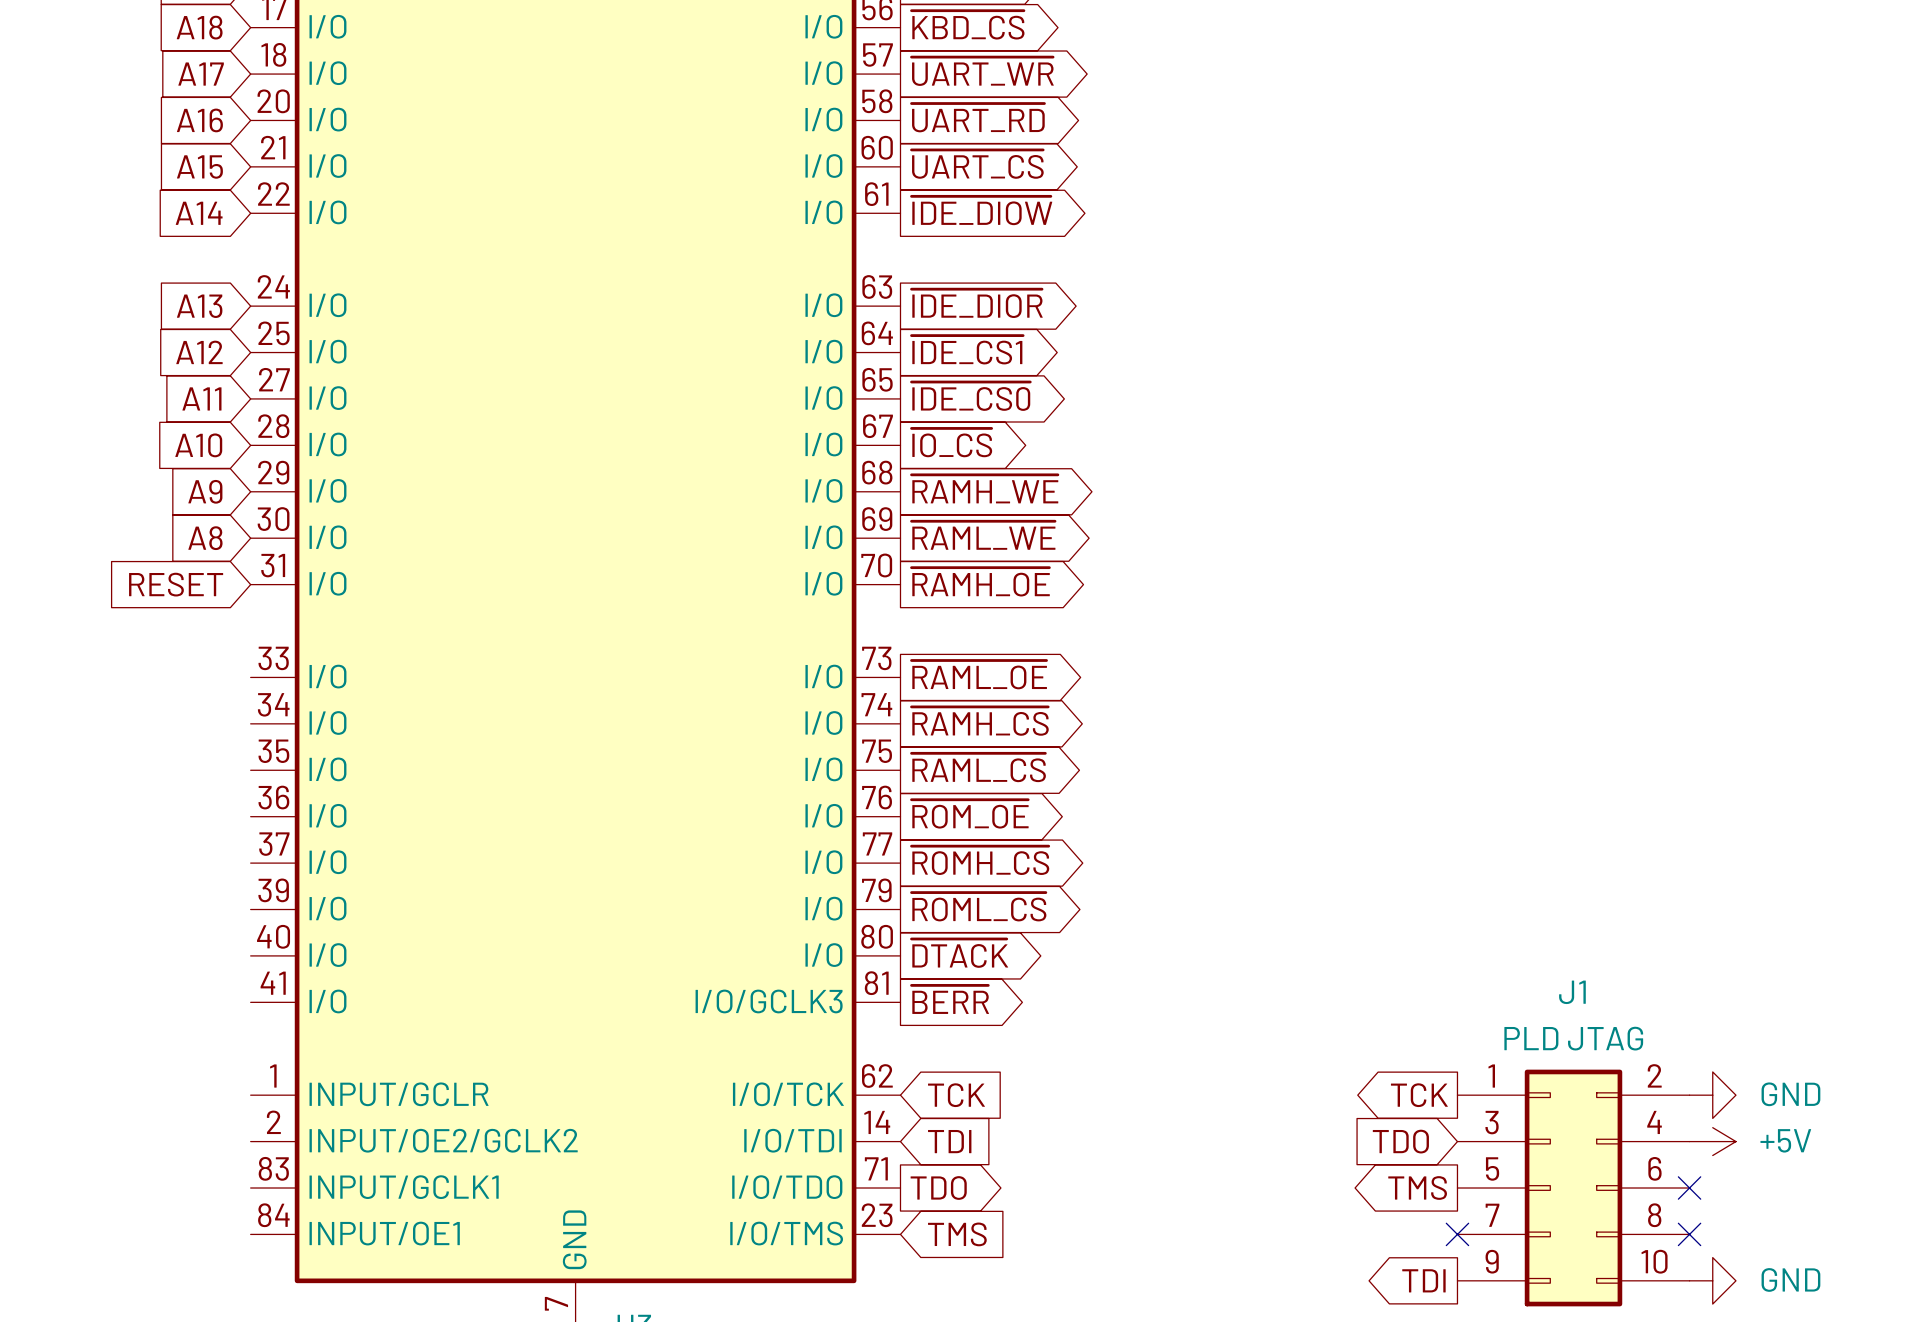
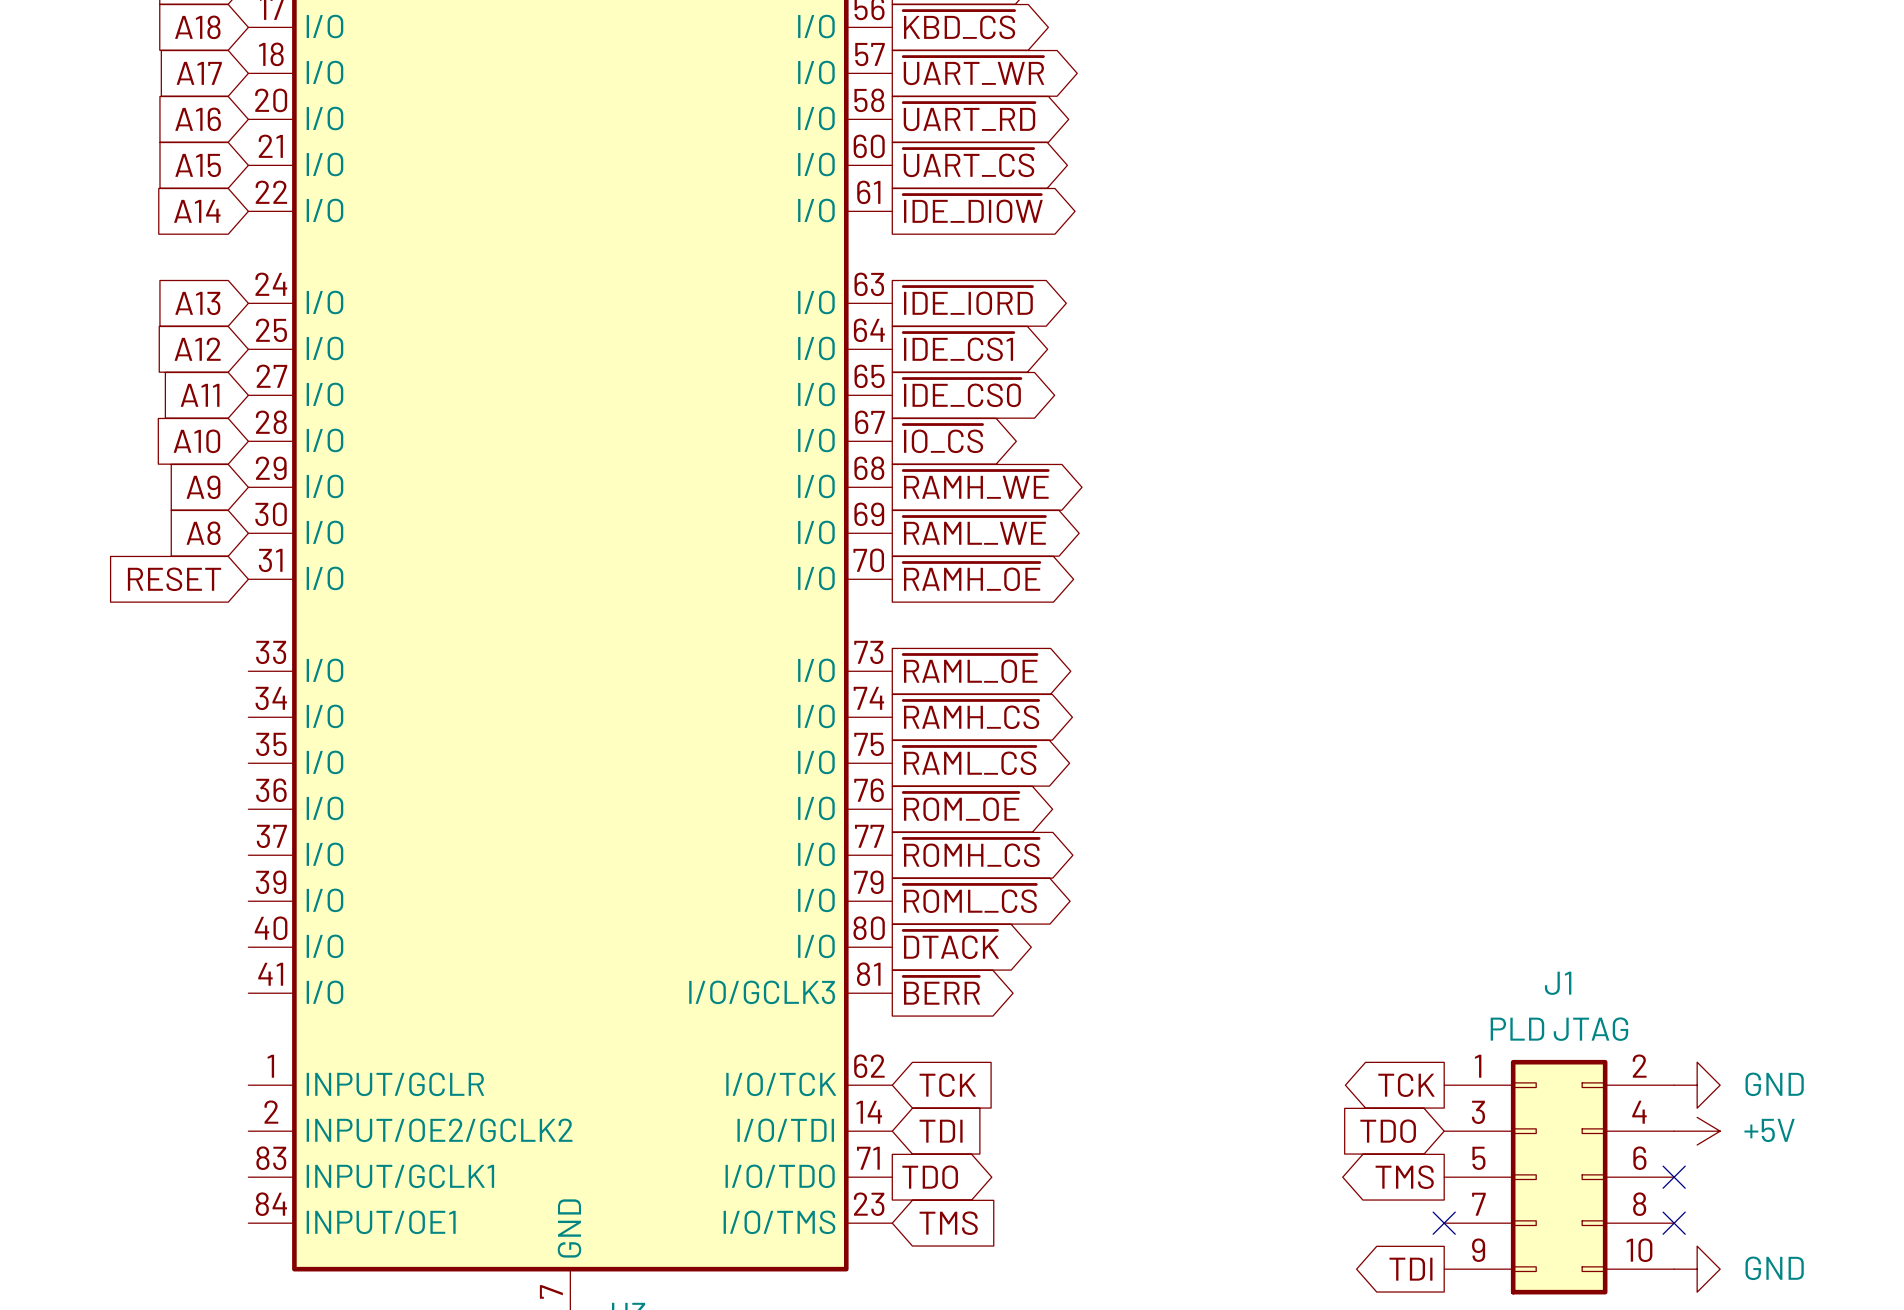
global label: ~{IDE_DIOR} (977, 303) -> ~{IDE_IORD} (968, 300)

